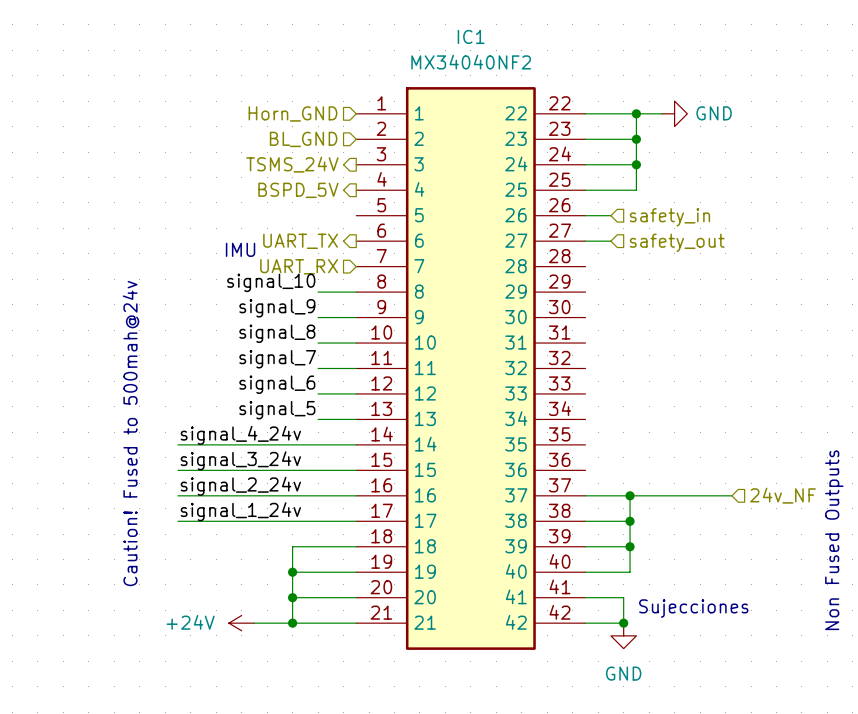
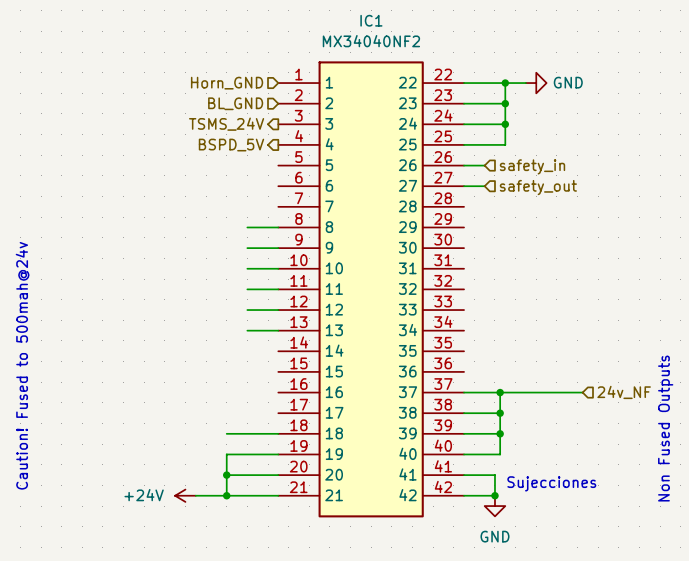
hierarchical label: UART_TX (300, 241) -> none
text: IMU (240, 249) -> none
hierarchical label: UART_RX (299, 266) -> none
label: signal_10 (271, 282) -> none
label: signal_9 (277, 308) -> none
label: signal_8 (277, 333) -> none
label: signal_7 (277, 359) -> none
label: signal_6 (277, 384) -> none
label: signal_5 (277, 410) -> none
text position: Caution! Fused to 500mah@24v (131, 433) -> Caution! Fused to 500mah@24v (22, 365)
label: signal_4_24v (240, 435) -> none
wire: (178, 444) (356, 444) -> none
label: signal_3_24v (240, 460) -> none
wire: (178, 470) (356, 470) -> none
label: signal_2_24v (240, 486) -> none
wire: (178, 495) (356, 495) -> none
label: signal_1_24v (240, 511) -> none
wire: (178, 521) (356, 521) -> none
wire: (292, 546) (292, 572) -> none
junction: (292, 572) -> none

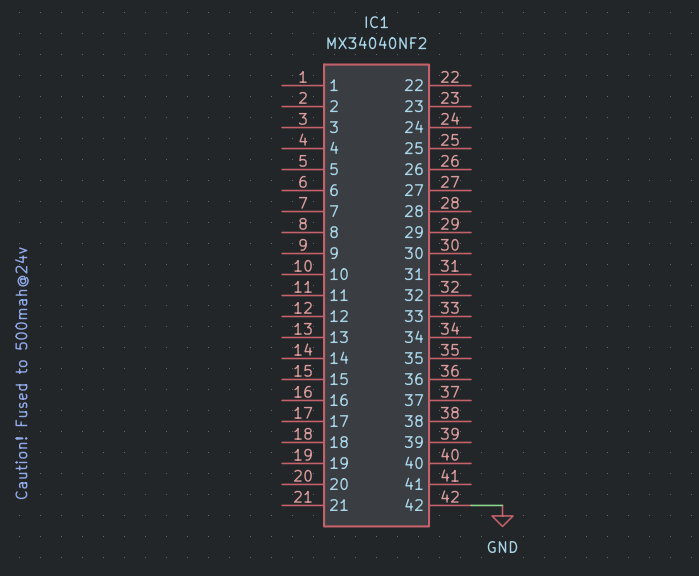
hierarchical label: Horn_GND (227, 83) -> none
wire: (464, 83) (525, 83) -> none
wire: (505, 83) (505, 144) (464, 144) -> none
junction: (505, 83) -> none
power symbol: GND (536, 83) -> none
hierarchical label: BL_GND (235, 103) -> none
wire: (464, 103) (505, 103) -> none
junction: (505, 103) -> none
hierarchical label: TSMS_24V (226, 124) -> none
wire: (464, 124) (505, 124) -> none
junction: (505, 124) -> none
hierarchical label: BSPD_5V (231, 145) -> none
wire: (464, 165) (484, 165) -> none
hierarchical label: safety_in (532, 166) -> none
wire: (464, 186) (484, 186) -> none
hierarchical label: safety_out (538, 187) -> none
wire: (247, 227) (278, 227) -> none
wire: (247, 248) (278, 248) -> none
wire: (247, 268) (278, 268) -> none
wire: (247, 289) (278, 289) -> none
wire: (247, 310) (278, 310) -> none
wire: (247, 330) (278, 330) -> none
wire: (464, 392) (582, 392) -> none
wire: (500, 392) (500, 454) (464, 454) -> none
junction: (500, 392) -> none
hierarchical label: 24v_NF (624, 392) -> none
wire: (464, 413) (500, 413) -> none
junction: (500, 413) -> none
text: Non Fused Outputs (665, 428) -> none
wire: (226, 433) (278, 433) -> none
wire: (464, 433) (500, 433) -> none
junction: (500, 433) -> none
wire: (278, 454) (226, 454) (226, 495) -> none
wire: (226, 475) (278, 475) -> none
junction: (226, 475) -> none
wire: (464, 475) (494, 475) (494, 495) -> none
text: Sujecciones (551, 483) -> none
power symbol: +24V (185, 495) -> none
wire: (195, 495) (278, 495) -> none
junction: (226, 495) -> none
junction: (494, 495) -> none

